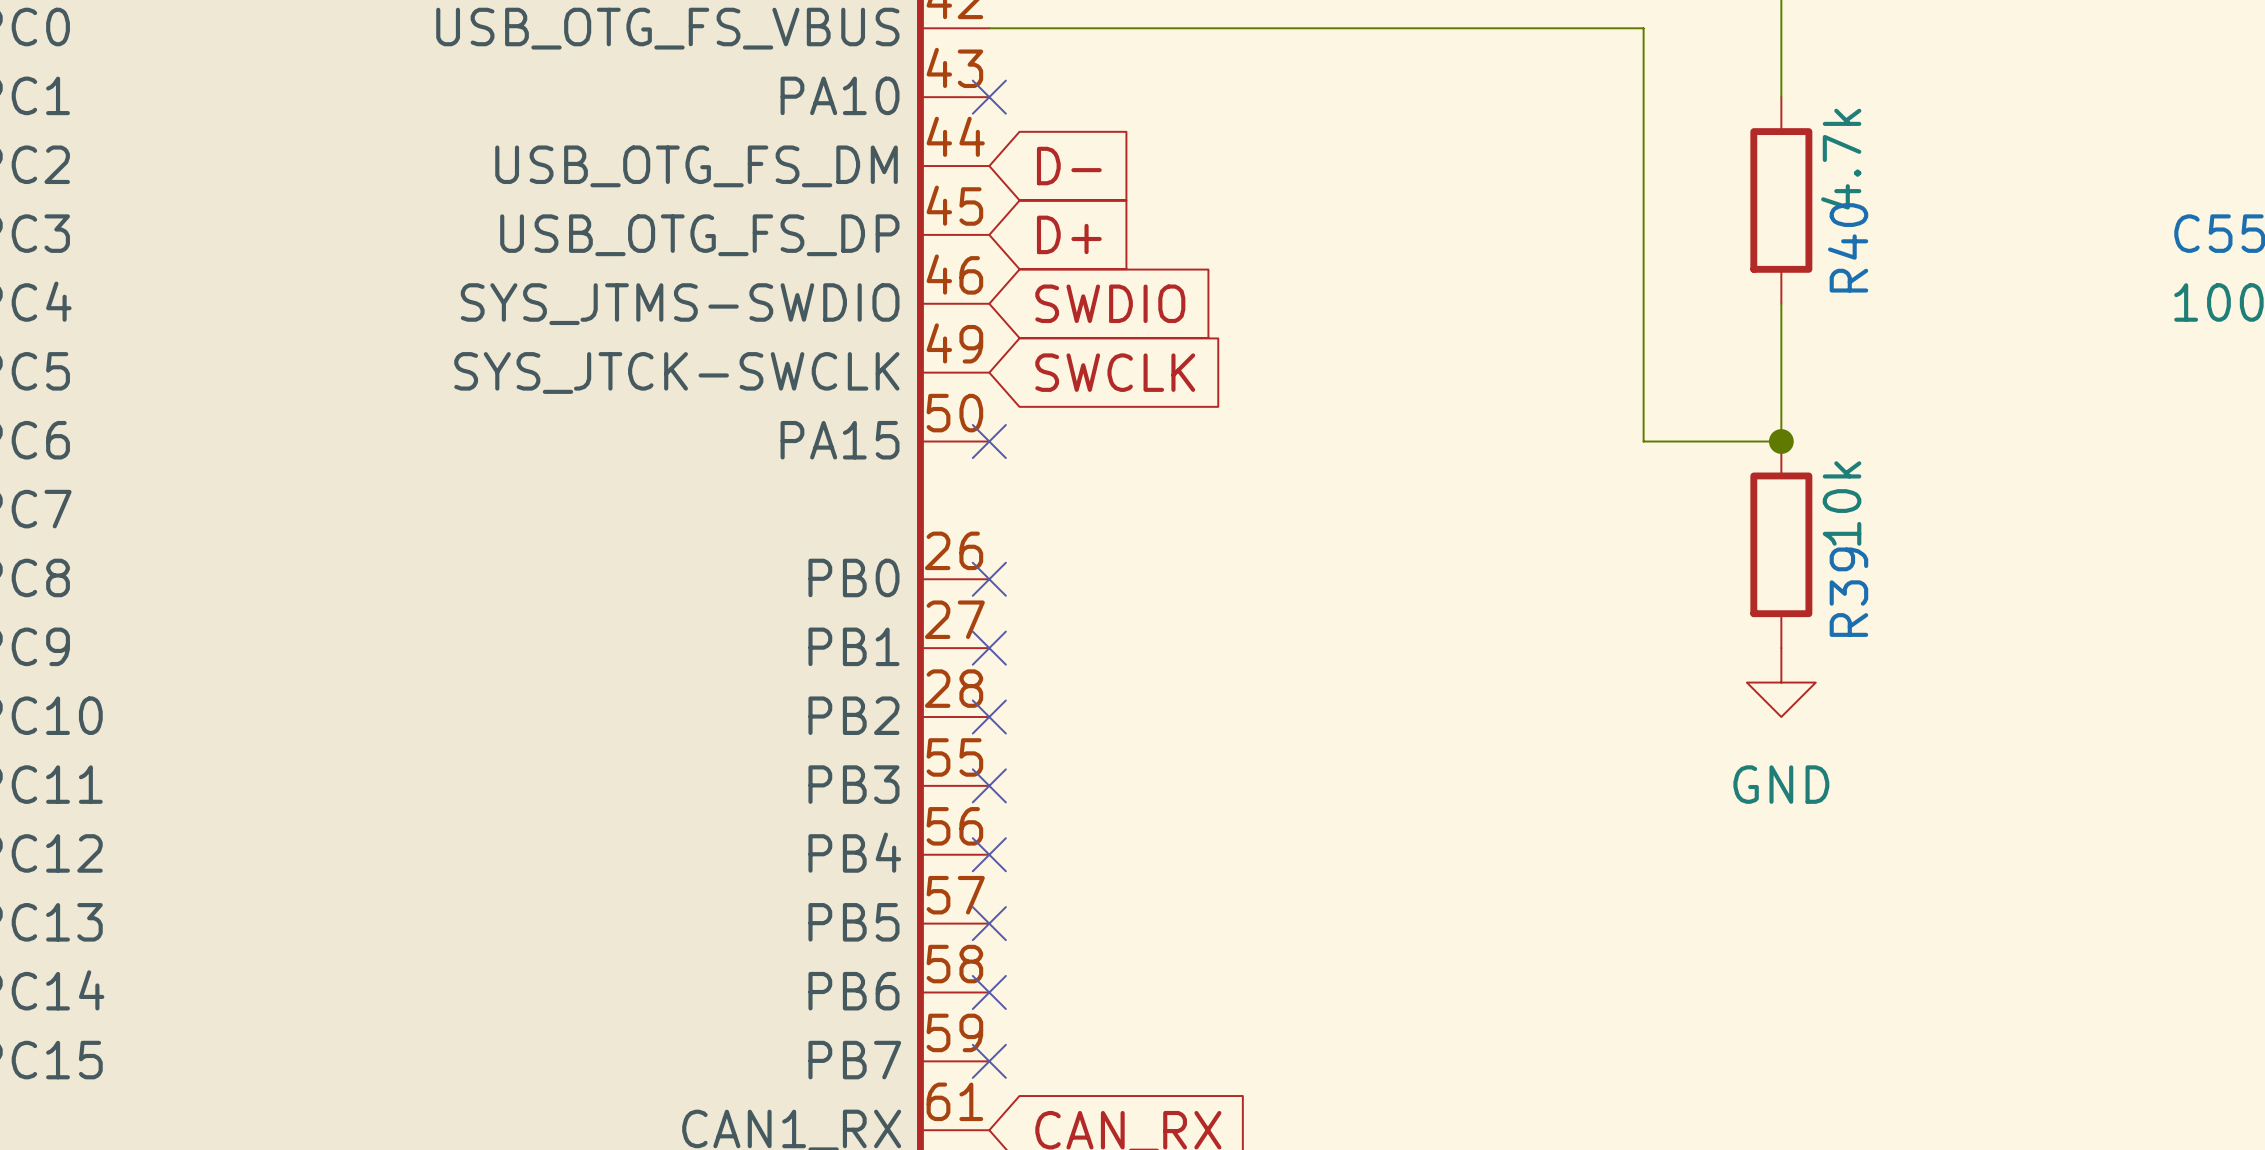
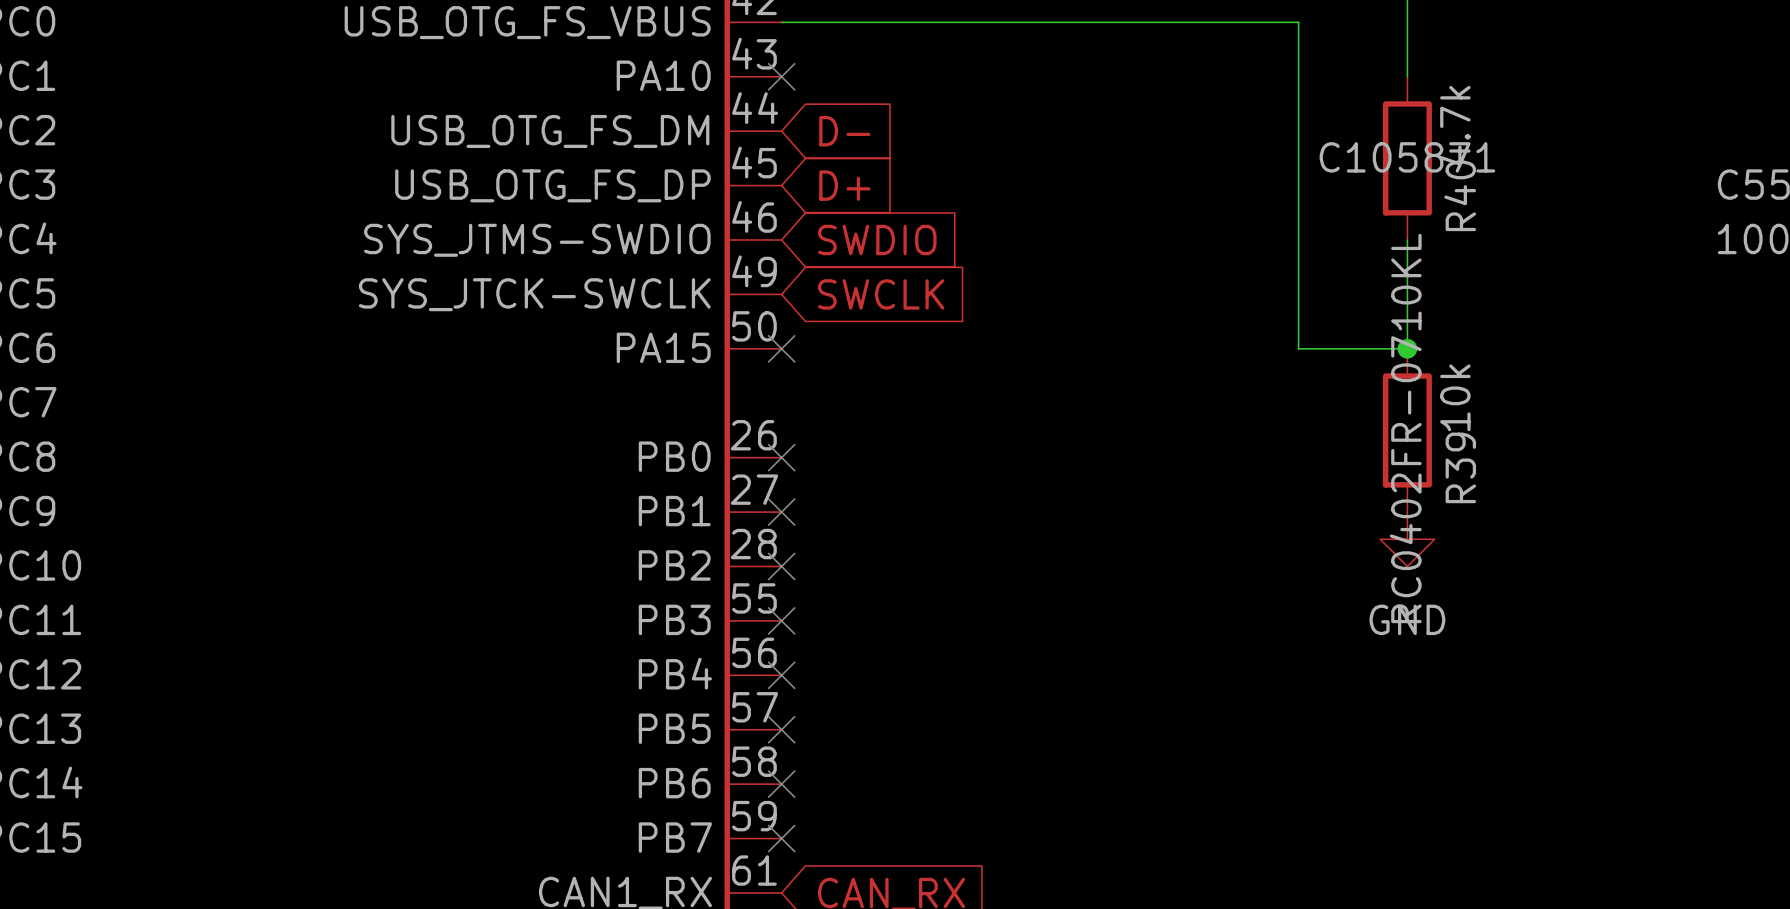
R40 text: none -> C105871 (1407, 157)
R39 text: none -> RC0402FR-0710KL (1405, 428)

